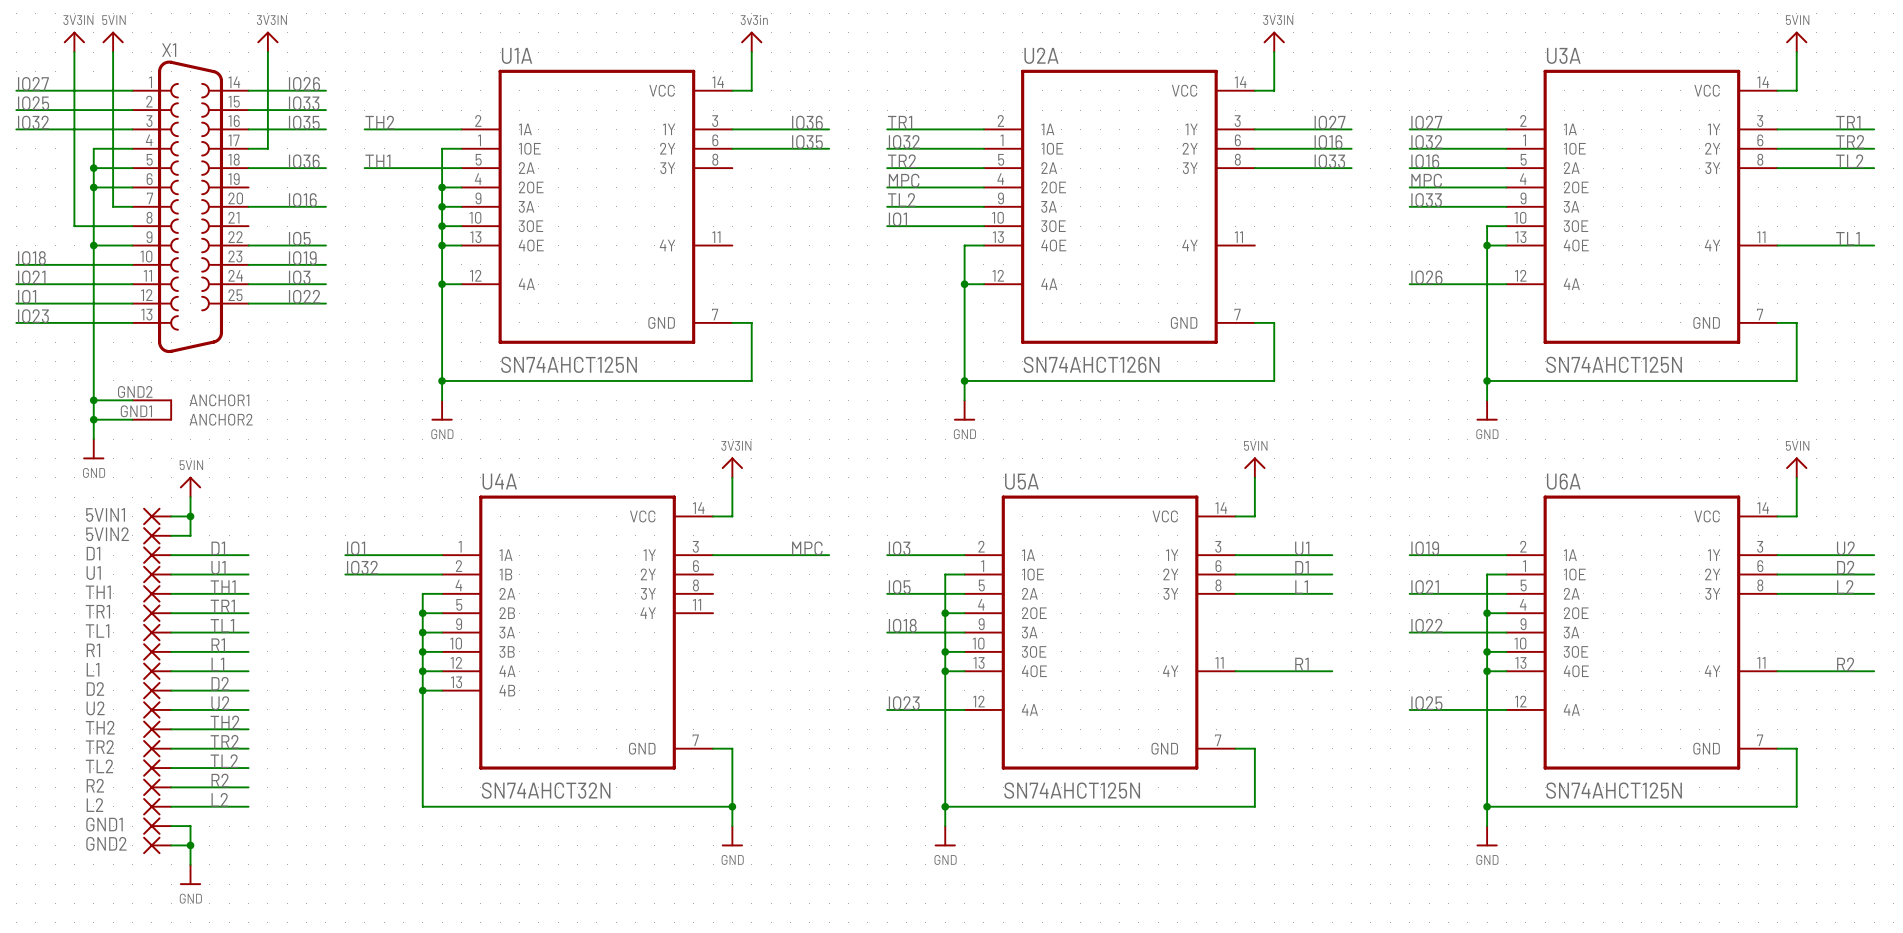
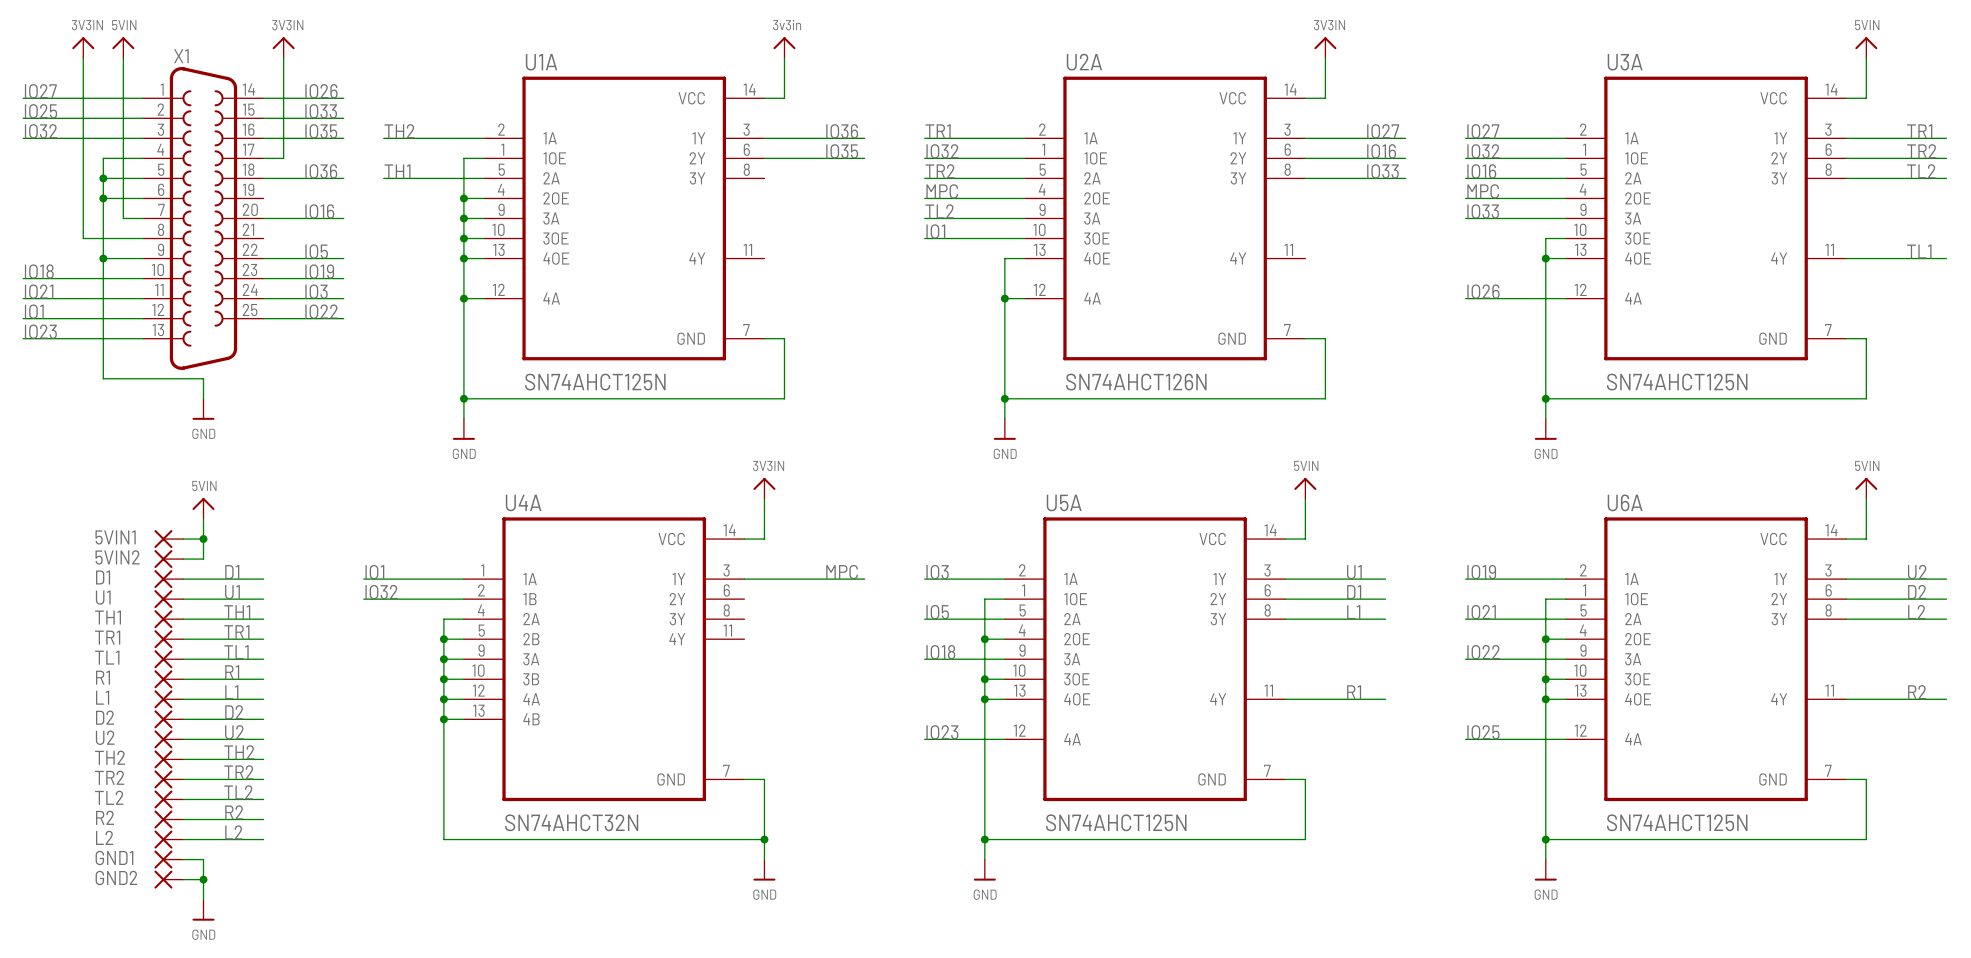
X1 symbol: [132, 60, 249, 421] -> [143, 67, 264, 370]
wire: (93, 361) (93, 439) -> (103, 378) (203, 378) (203, 398)
wire: (93, 400) (132, 400) -> none
junction: (93, 400) -> none
wire: (93, 419) (132, 419) -> none
junction: (93, 419) -> none
power symbol position: GND (93, 449) -> GND (203, 409)

